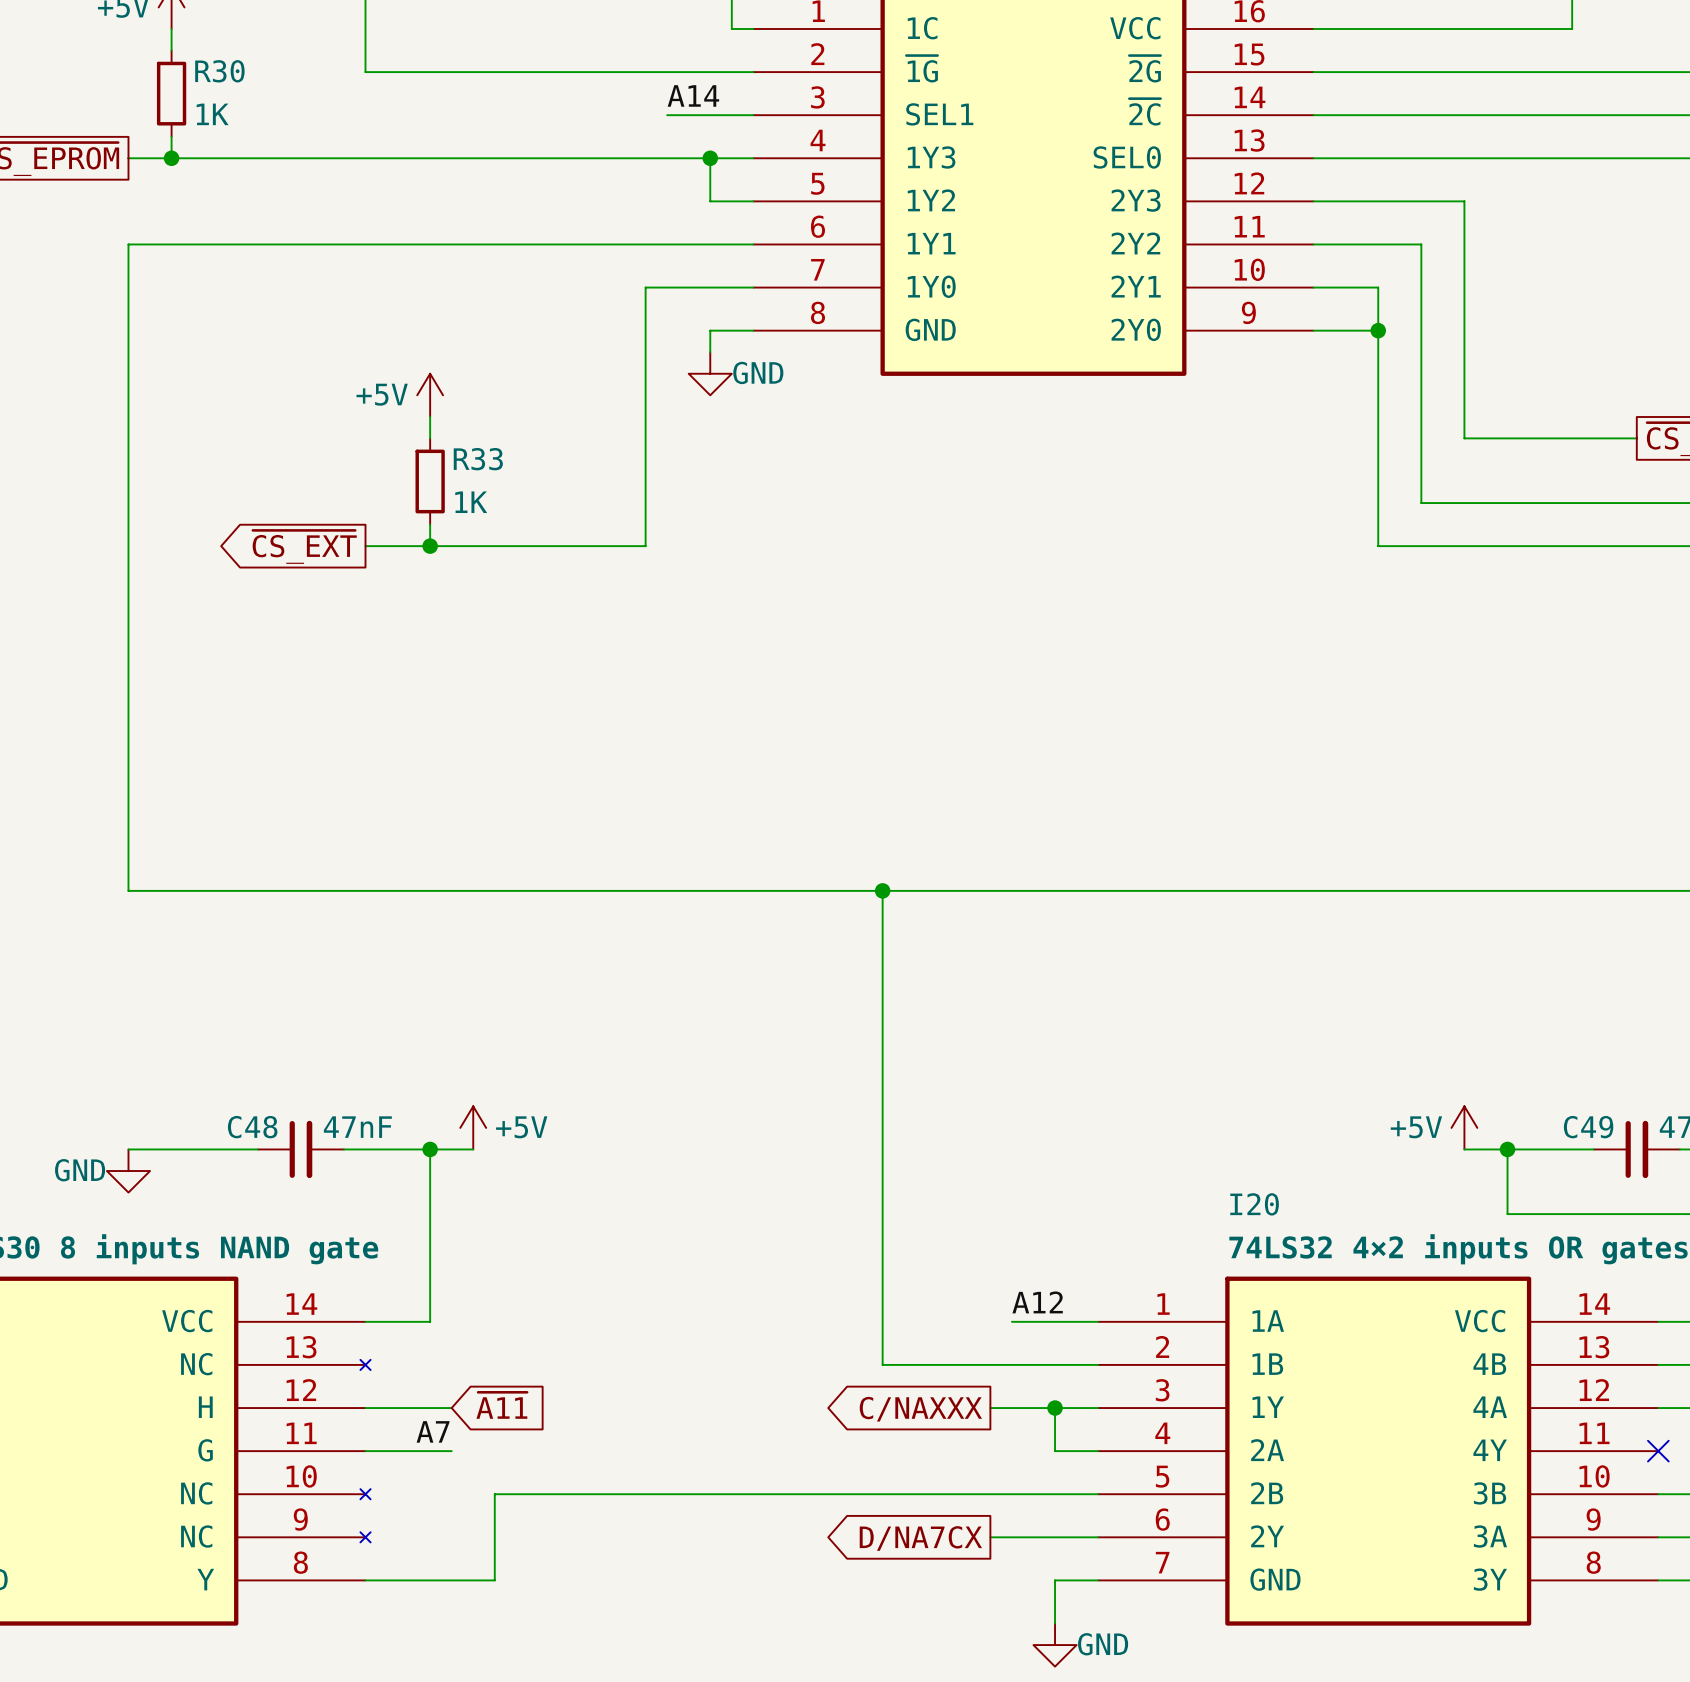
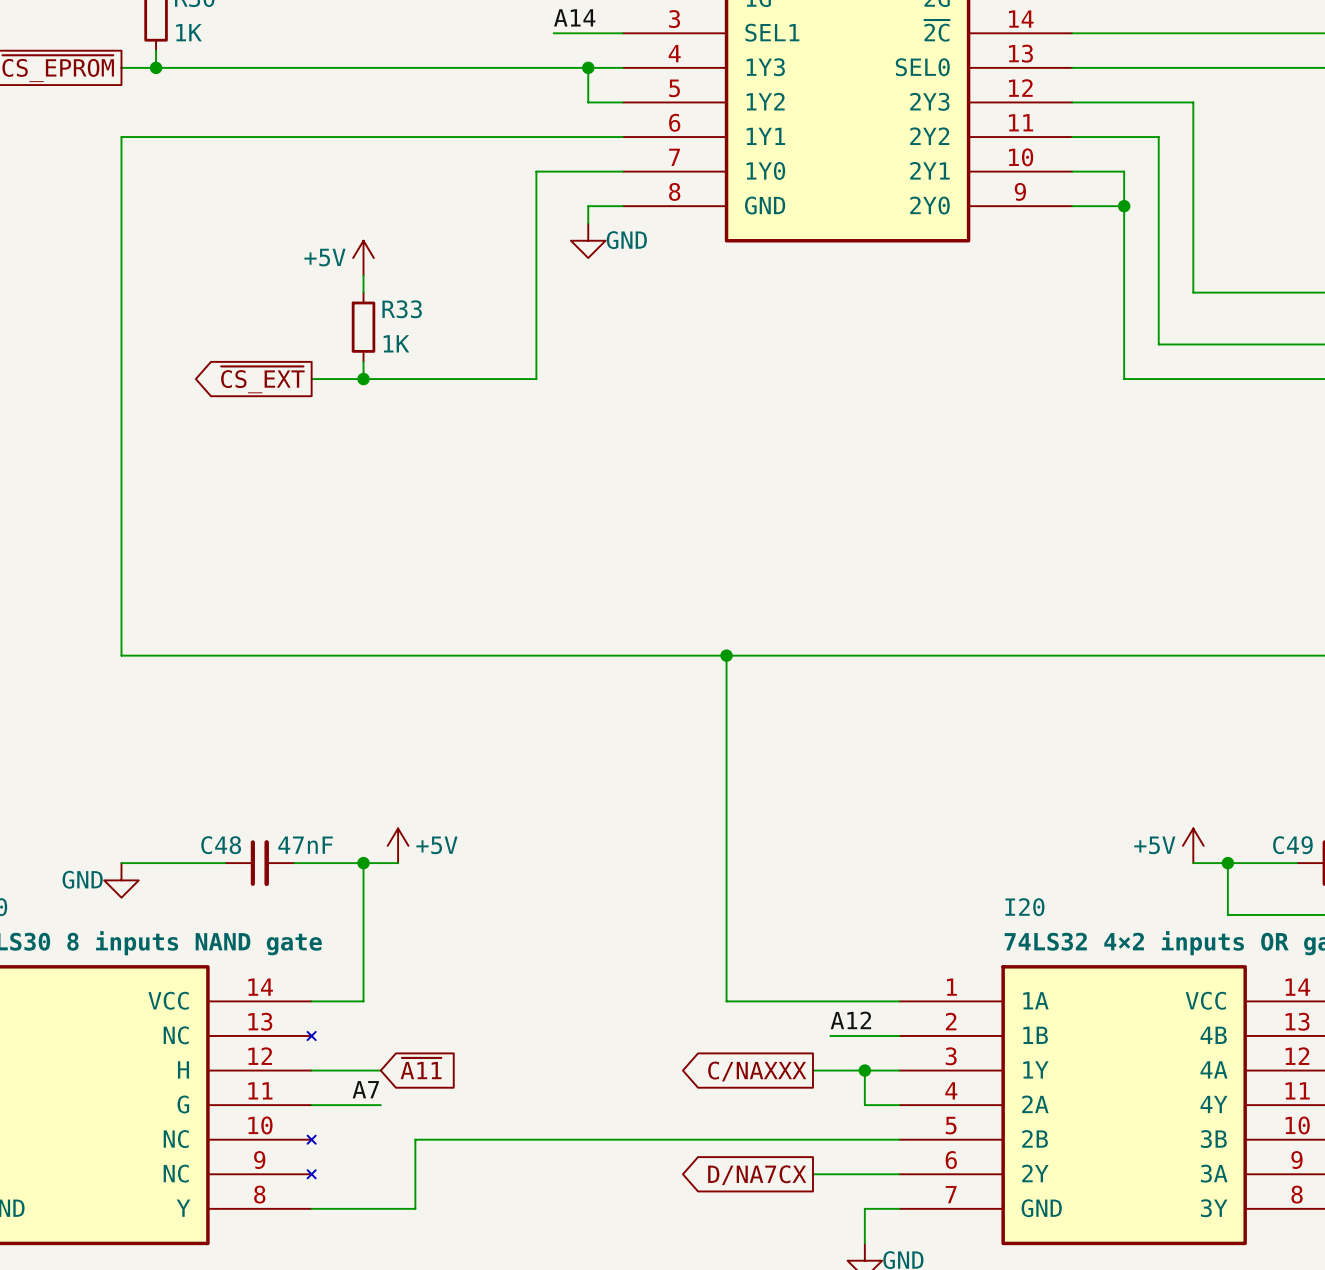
label position: A12 (1037, 1302) -> A12 (850, 1020)
wire: (882, 1321) (882, 1364) (1011, 1364) -> (726, 1001) (830, 1001)

